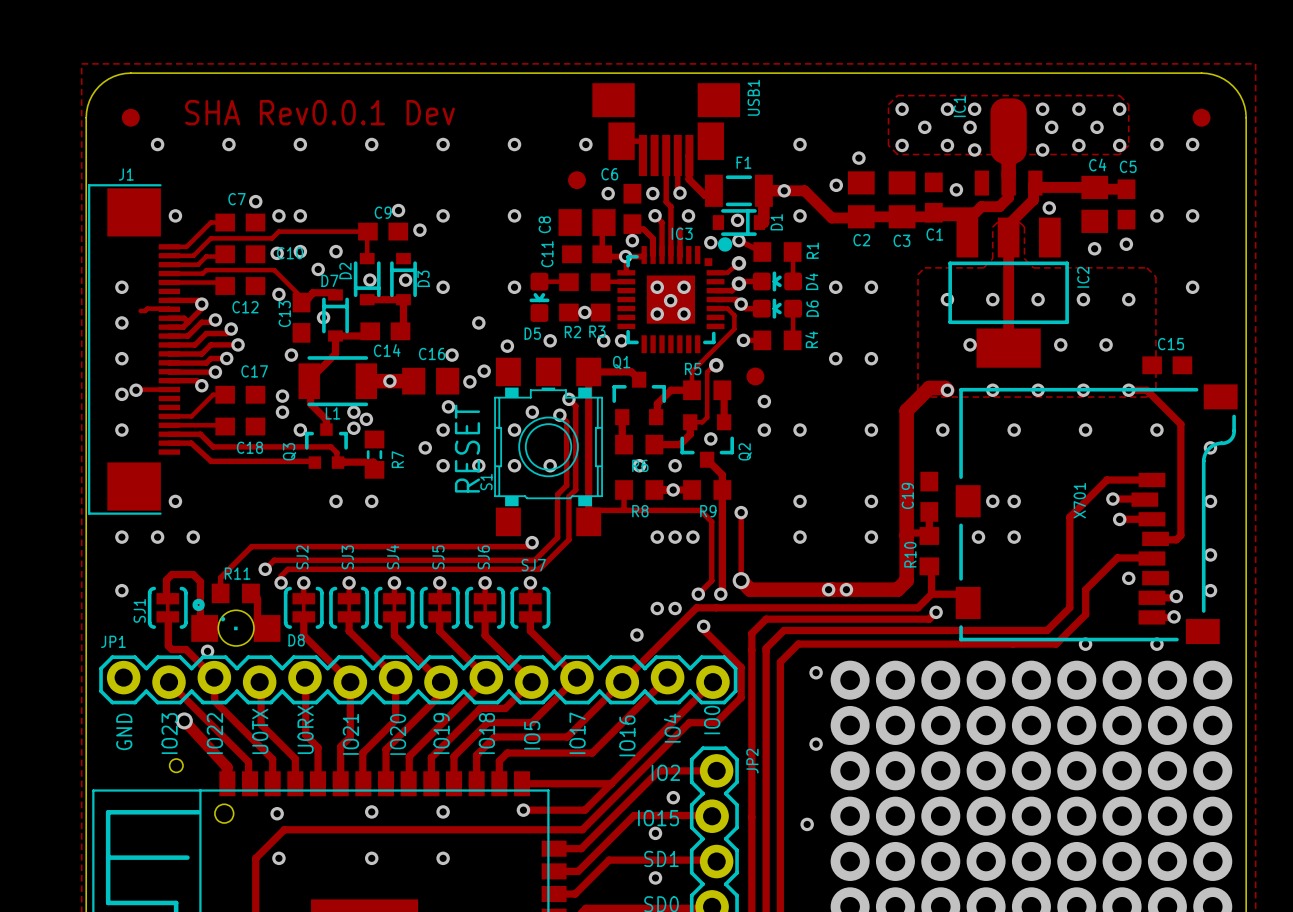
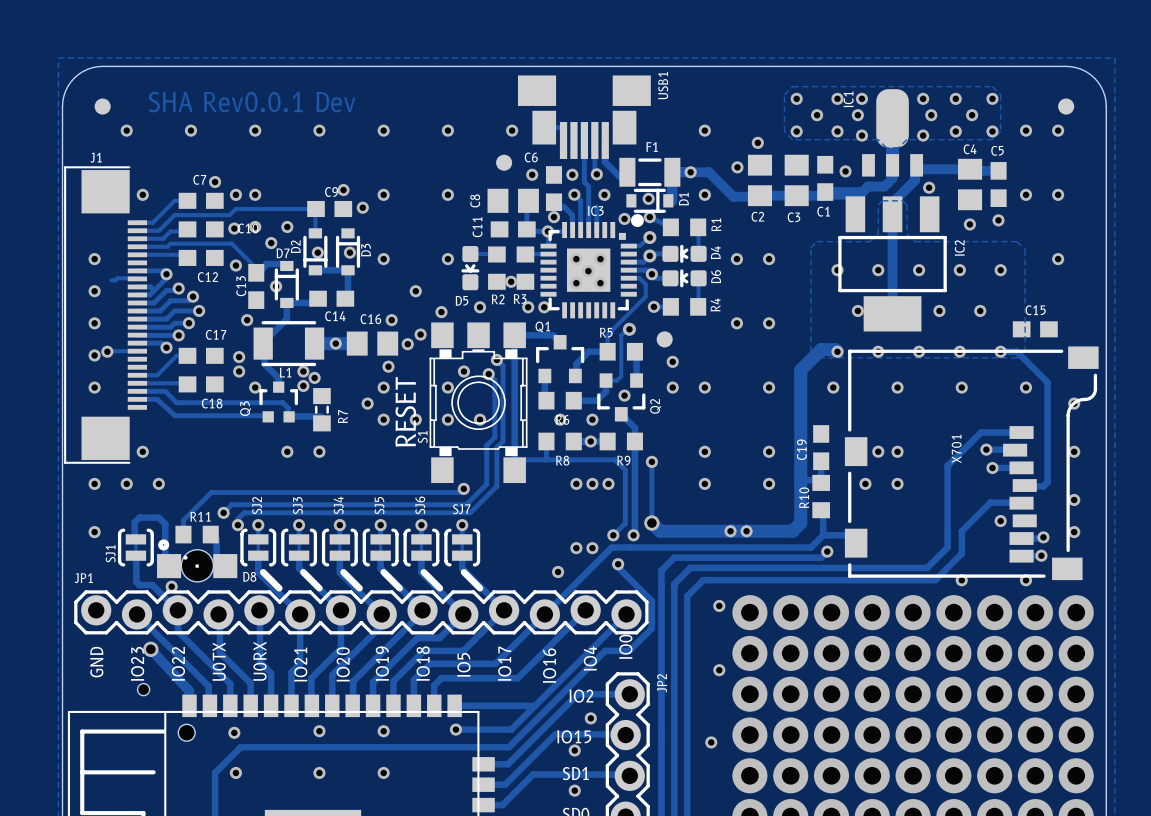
line: none -> (263, 572) (279, 588)
line: none -> (303, 572) (319, 588)
line: none -> (343, 572) (359, 588)
line: none -> (383, 572) (399, 588)
line: none -> (423, 572) (439, 588)
line: none -> (463, 572) (480, 588)

